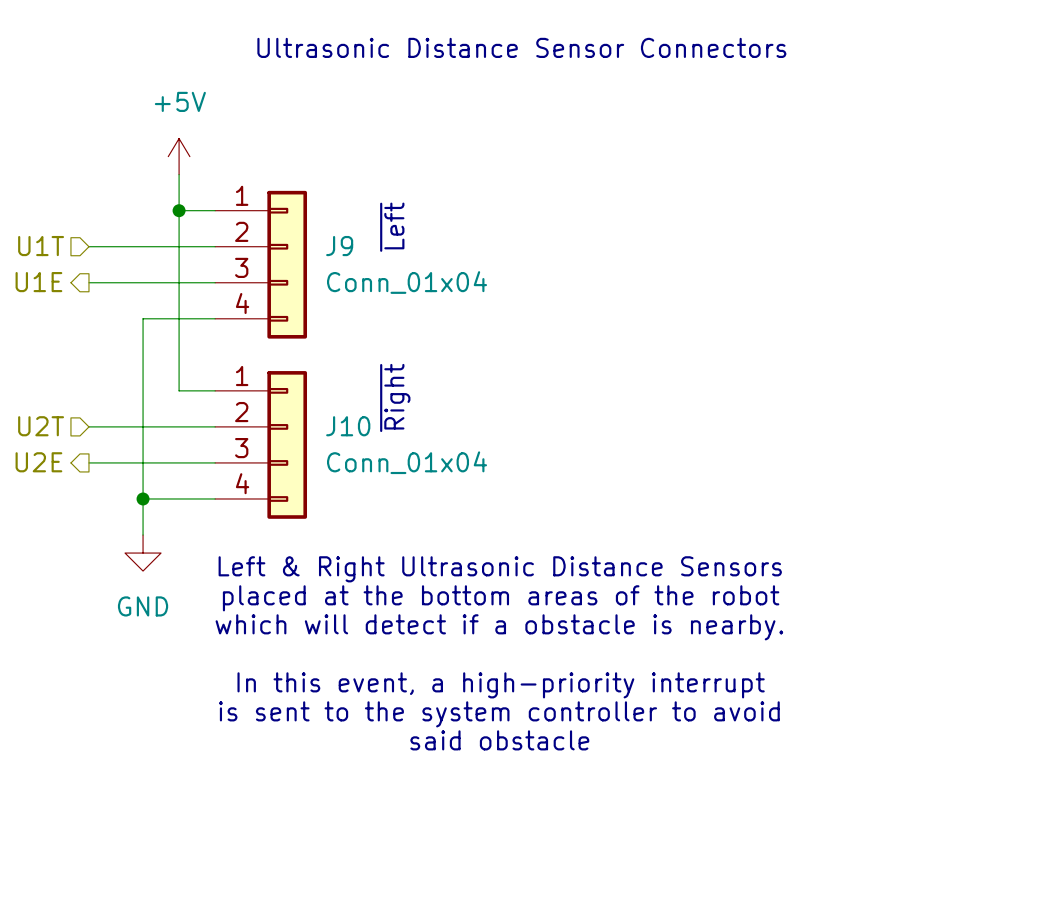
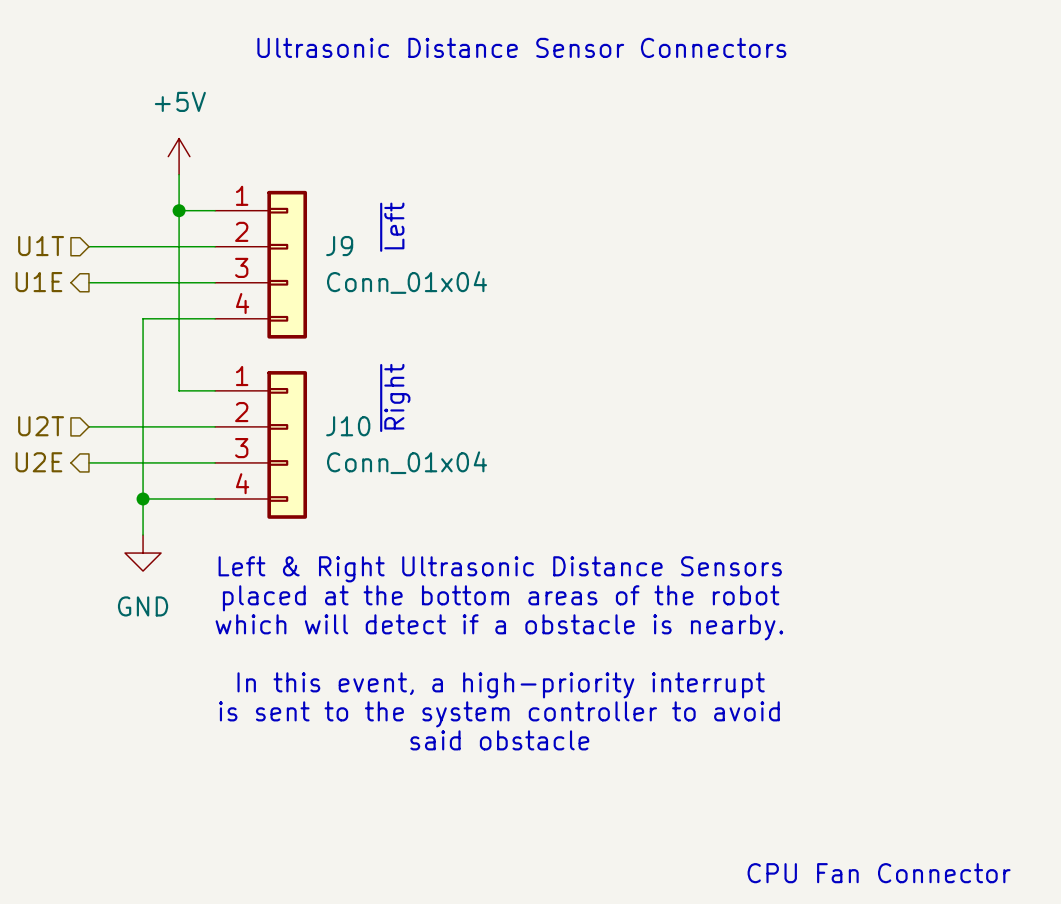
text: none -> CPU Fan Connector (879, 873)

